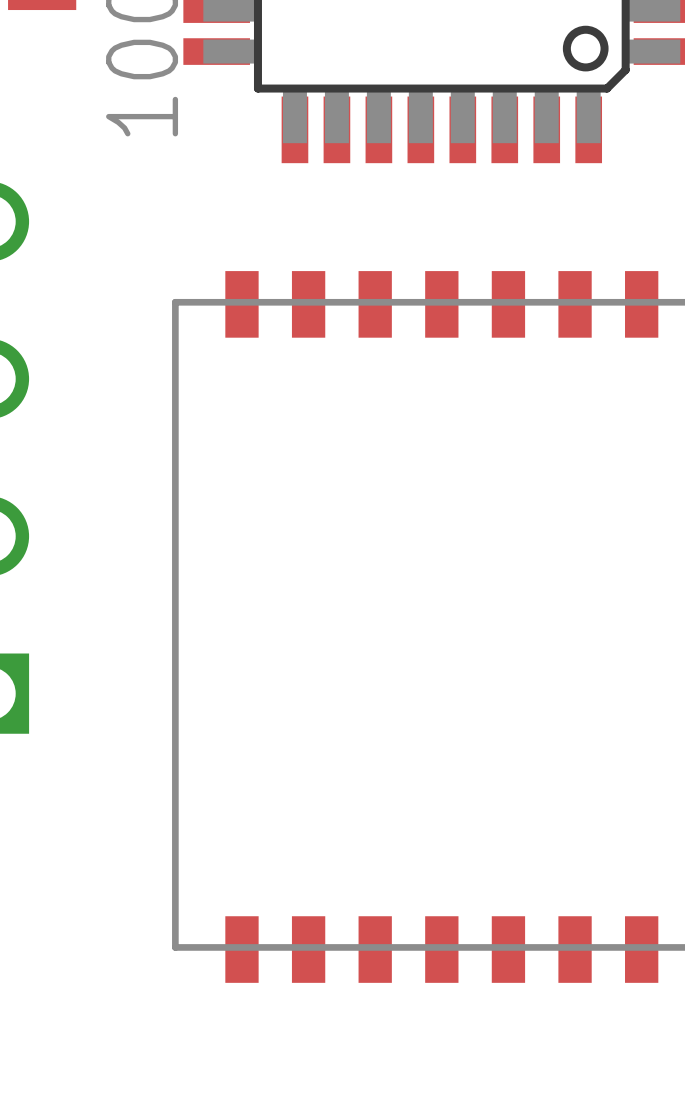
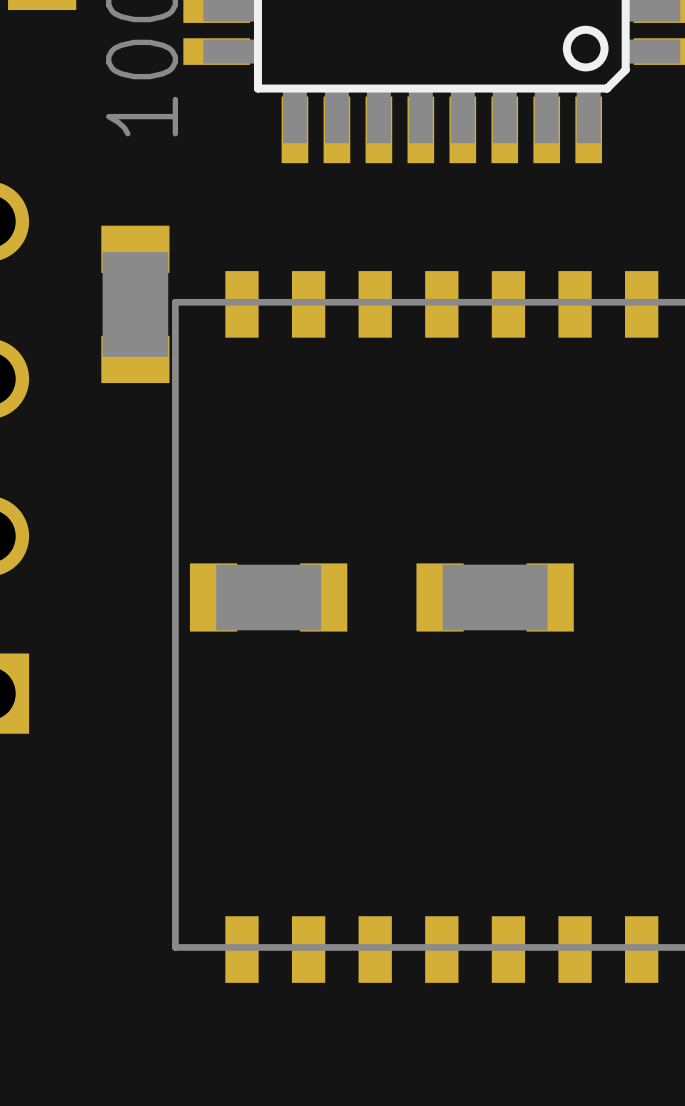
part: none -> (135, 304)
part: none -> (268, 597)
part: none -> (495, 597)

